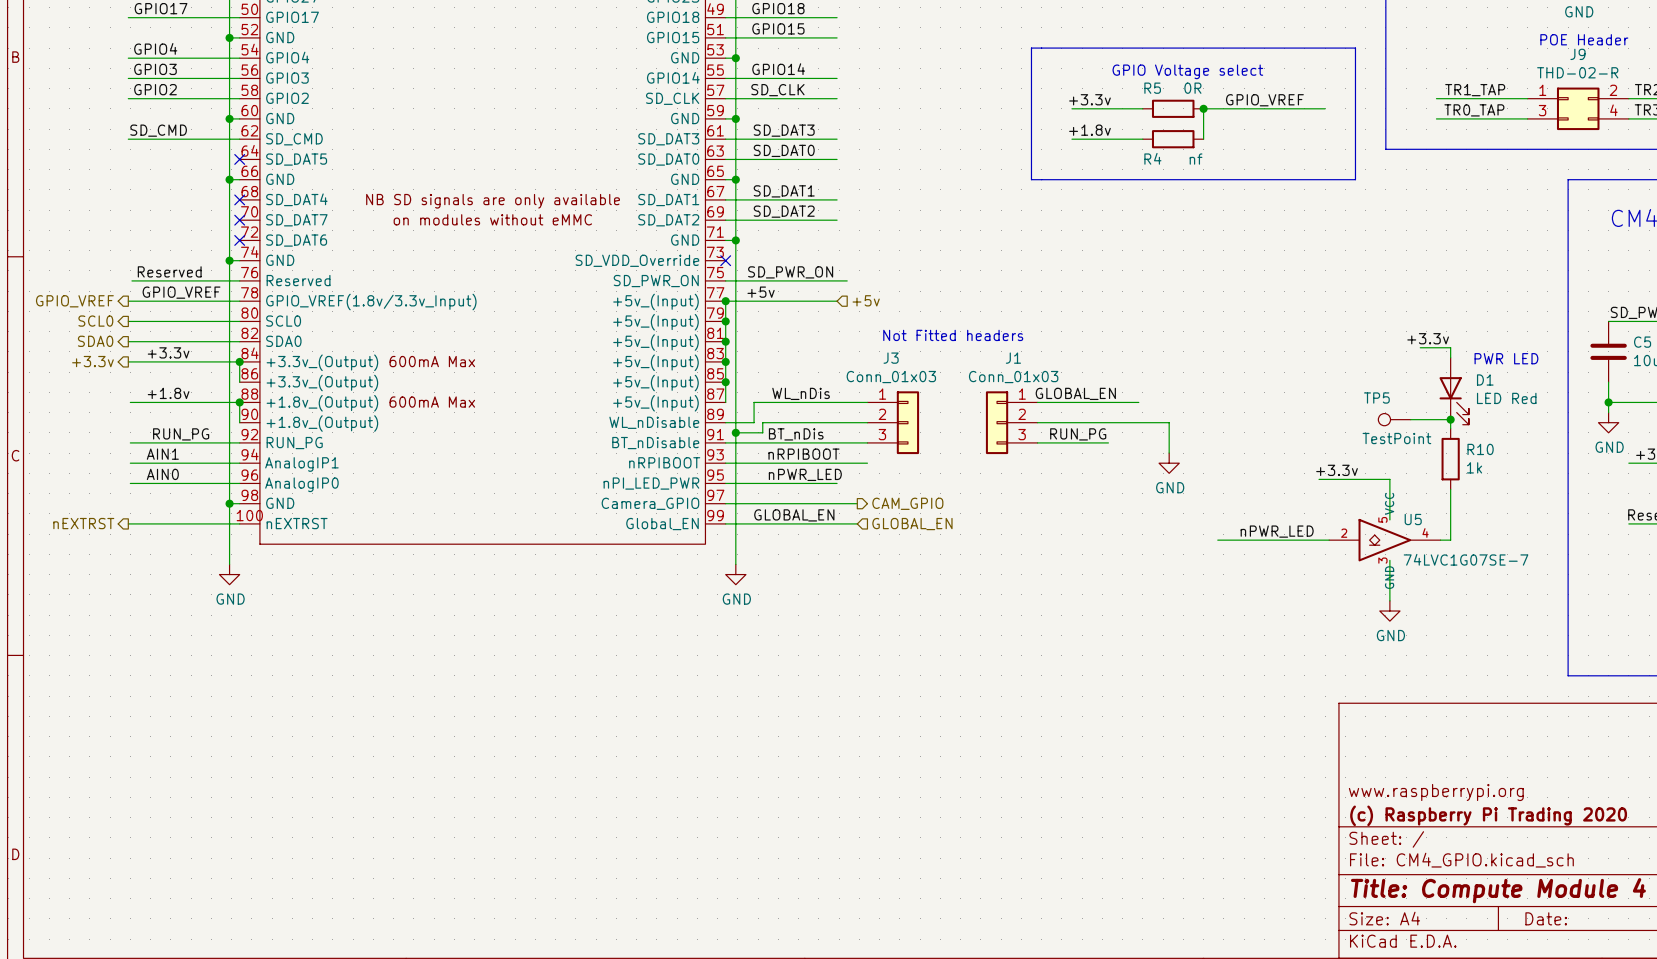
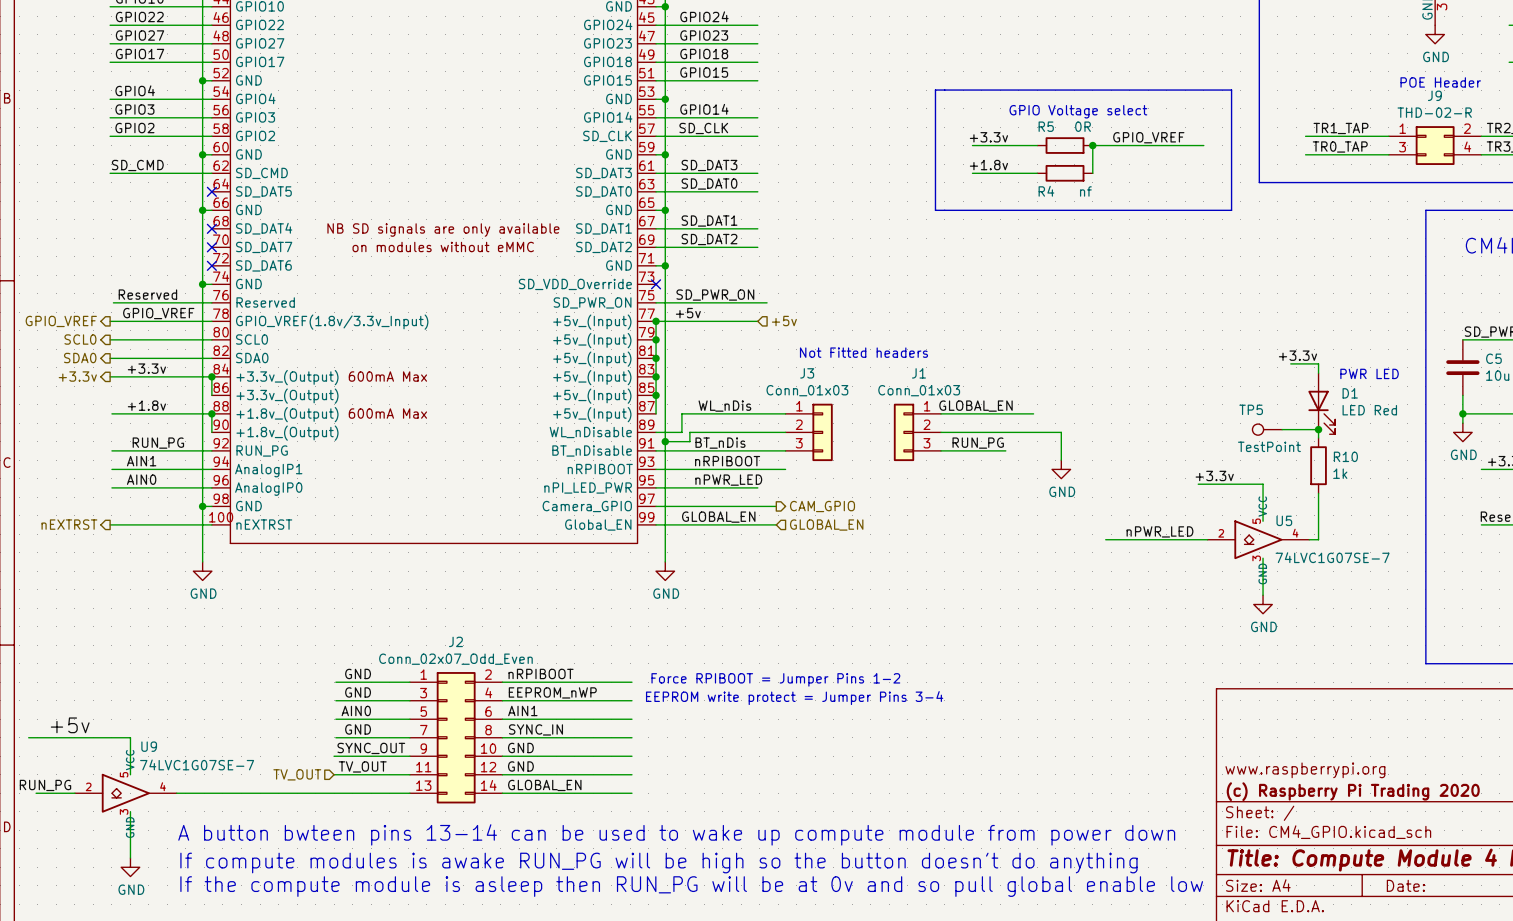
label: none -> GND (358, 673)
label: none -> nRPIBOOT (541, 673)
text: none -> Force RPIBOOT = Jumper Pins 1-2 (775, 679)
wire: none -> (335, 682) (409, 682)
wire: none -> (502, 682) (631, 682)
label: none -> GND (358, 692)
label: none -> EEPROM_nWP (552, 692)
text: none -> EEPROM write protect = Jumper Pins 3-4 (794, 698)
wire: none -> (335, 700) (409, 700)
wire: none -> (502, 700) (631, 700)
label: none -> AIN0 (356, 710)
label: none -> AIN1 (522, 710)
wire: none -> (335, 719) (409, 719)
wire: none -> (502, 719) (631, 719)
label: none -> +5v (70, 725)
label: none -> GND (358, 729)
label: none -> SYNC_IN (535, 729)
wire: none -> (28, 737) (130, 737) (130, 774)
wire: none -> (335, 737) (409, 737)
J2: none -> Conn_02x07_Odd_Even (456, 737)
wire: none -> (502, 737) (631, 737)
label: none -> SYNC_OUT (371, 748)
label: none -> GND (520, 747)
wire: none -> (334, 756) (409, 756)
wire: none -> (502, 756) (631, 756)
label: none -> TV_OUT (362, 766)
label: none -> GND (520, 766)
hierarchical label: none -> TV_OUT (297, 774)
wire: none -> (334, 774) (409, 774)
wire: none -> (502, 774) (631, 774)
label: none -> RUN_PG (45, 785)
label: none -> GLOBAL_EN (544, 785)
wire: none -> (36, 793) (74, 793)
U9: none -> 74LVC1G07SE-7 (125, 793)
wire: none -> (176, 793) (409, 793)
wire: none -> (502, 793) (631, 793)
wire: none -> (130, 811) (130, 858)
text: none -> A button bwteen pins 13-14 can be used to wake up compute module from power down (676, 834)
text: none -> If compute modules is awake RUN_PG will be high so the button doesn't do anything (658, 863)
power symbol: none -> GND (130, 867)
text: none -> If the compute module is asleep then RUN_PG will be at 0v and so pull global enable low (691, 886)

